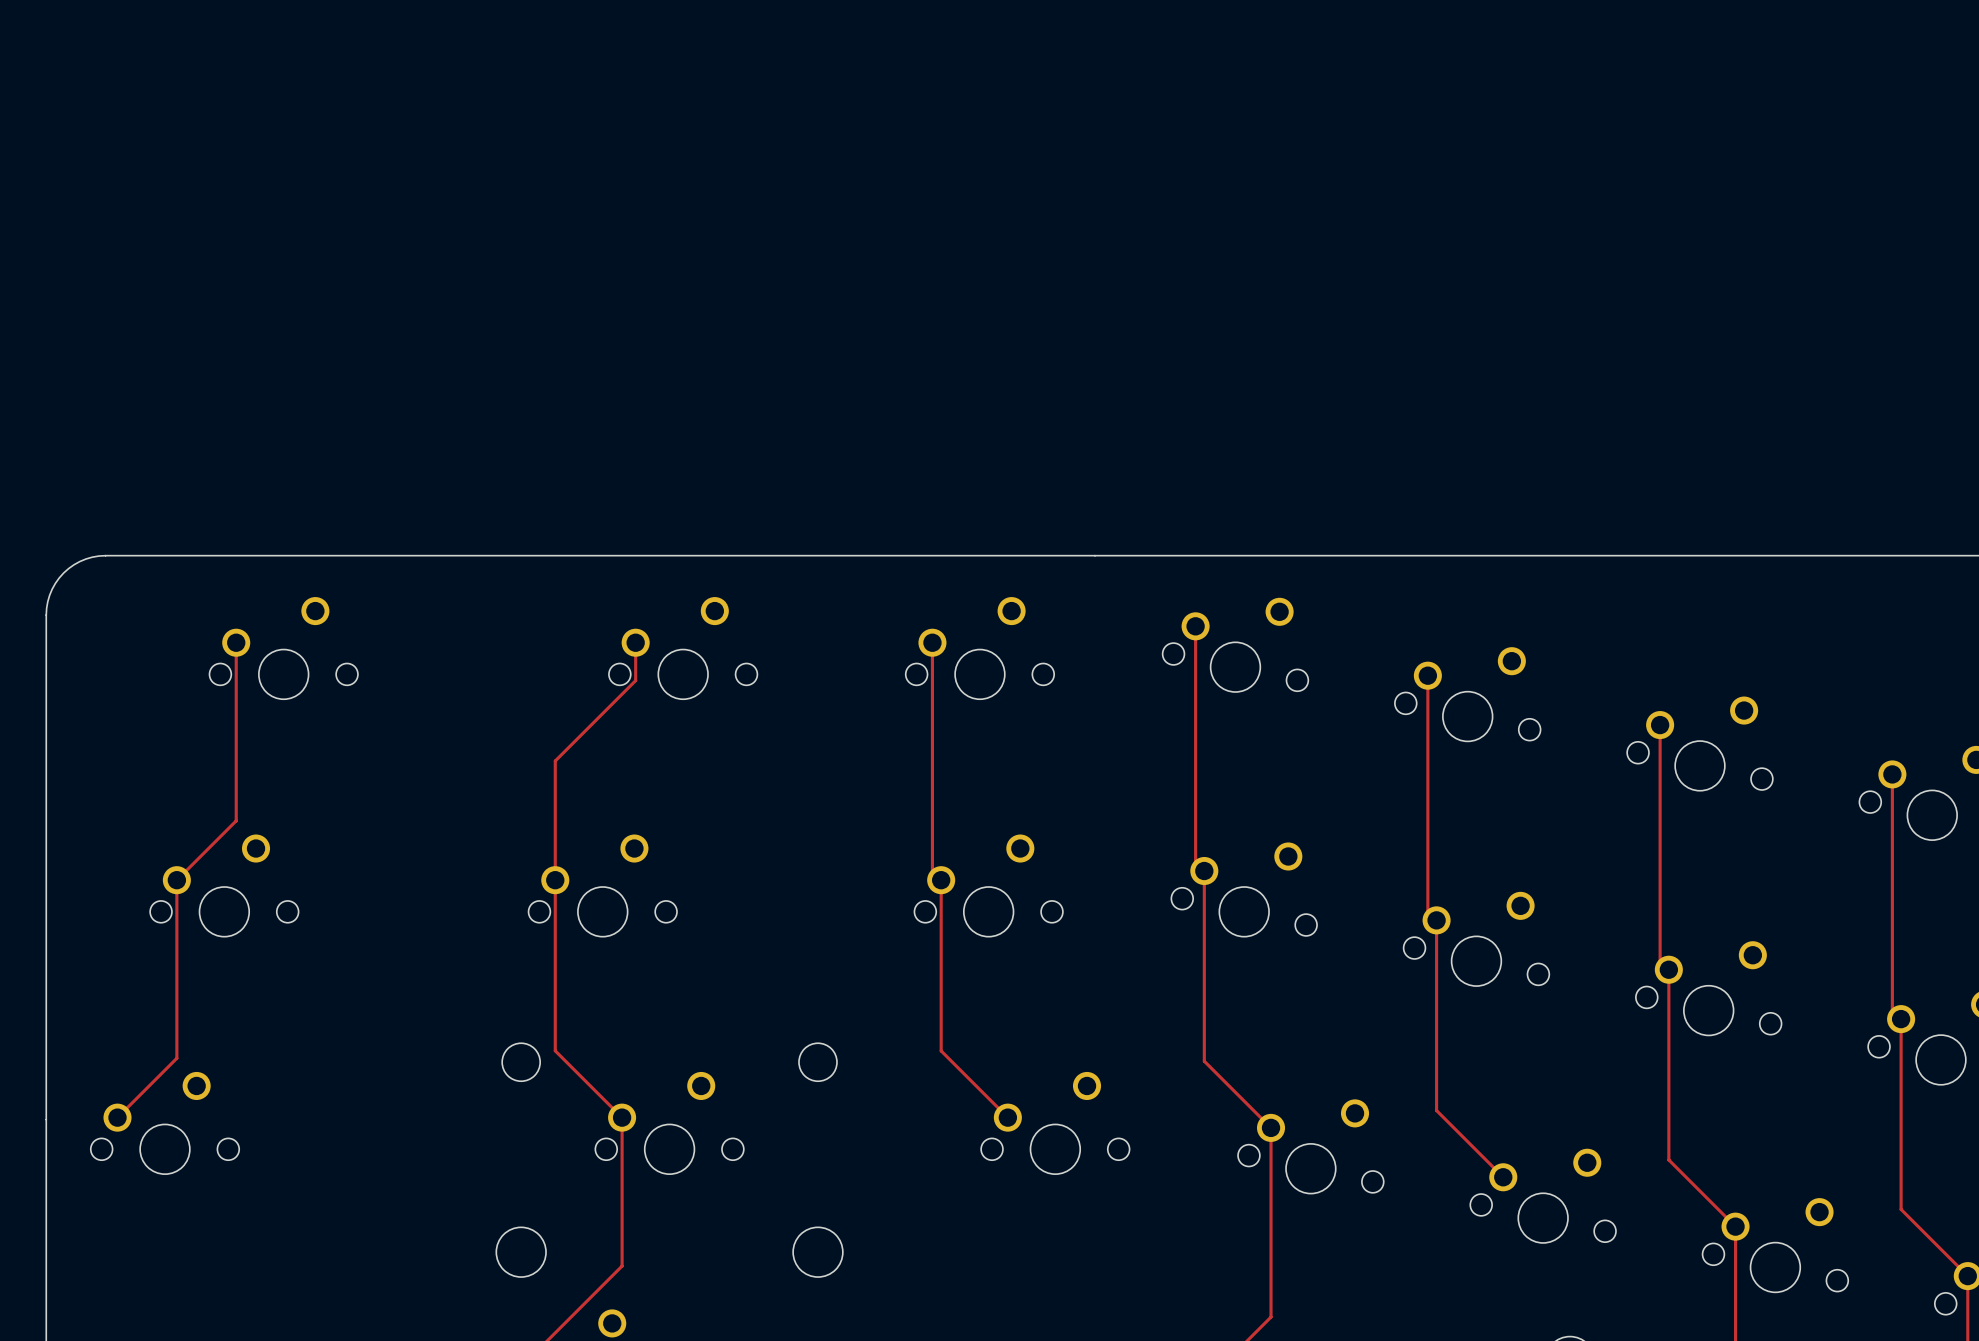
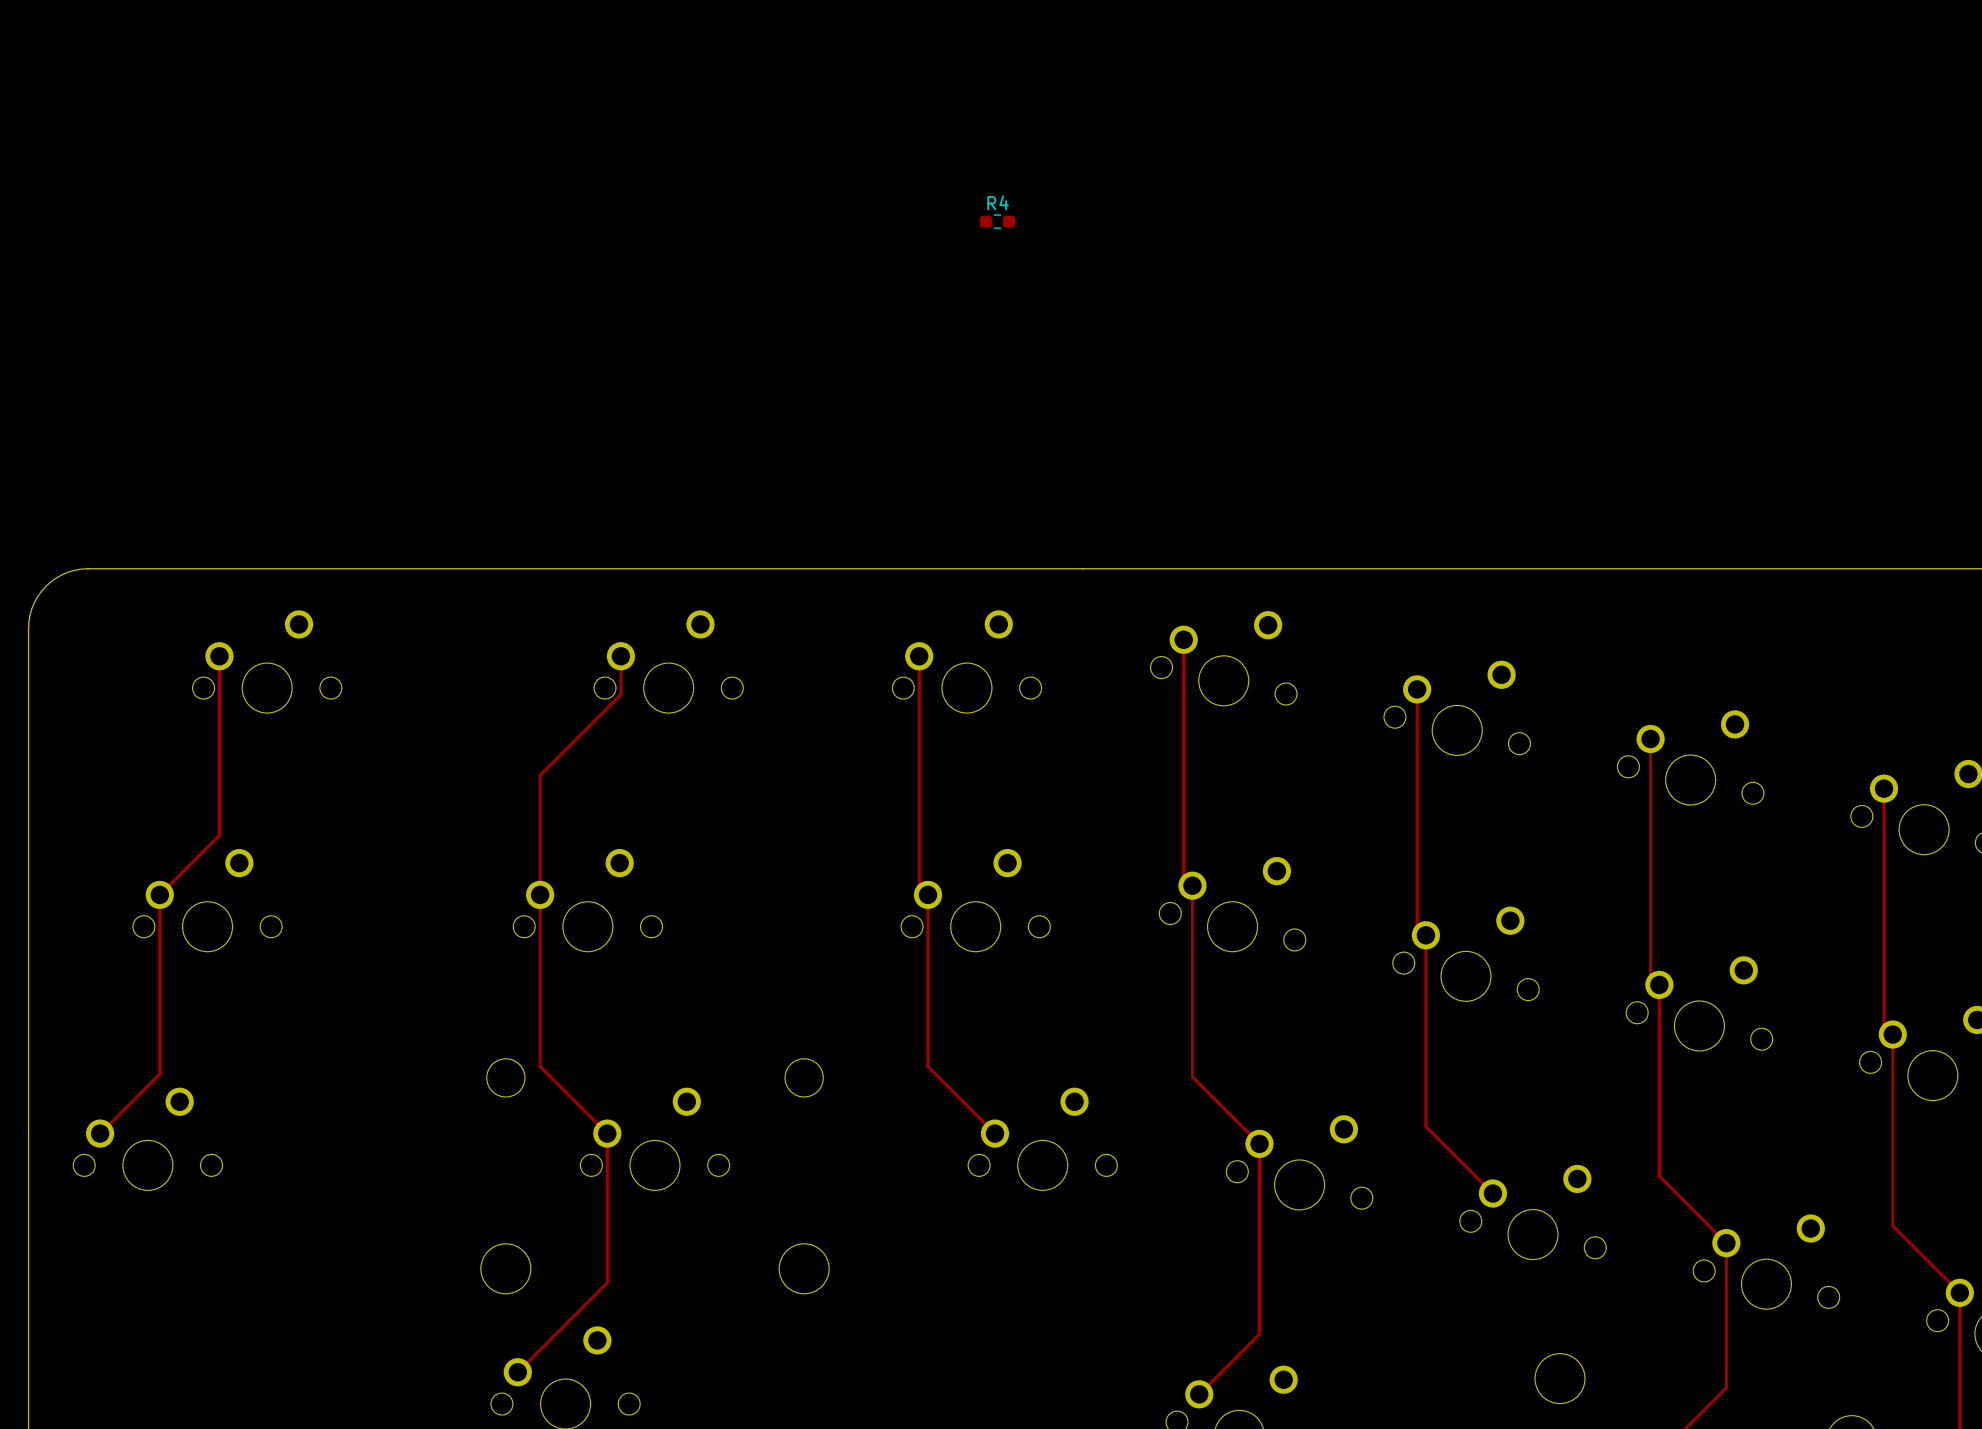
R4: none -> (997, 221)

